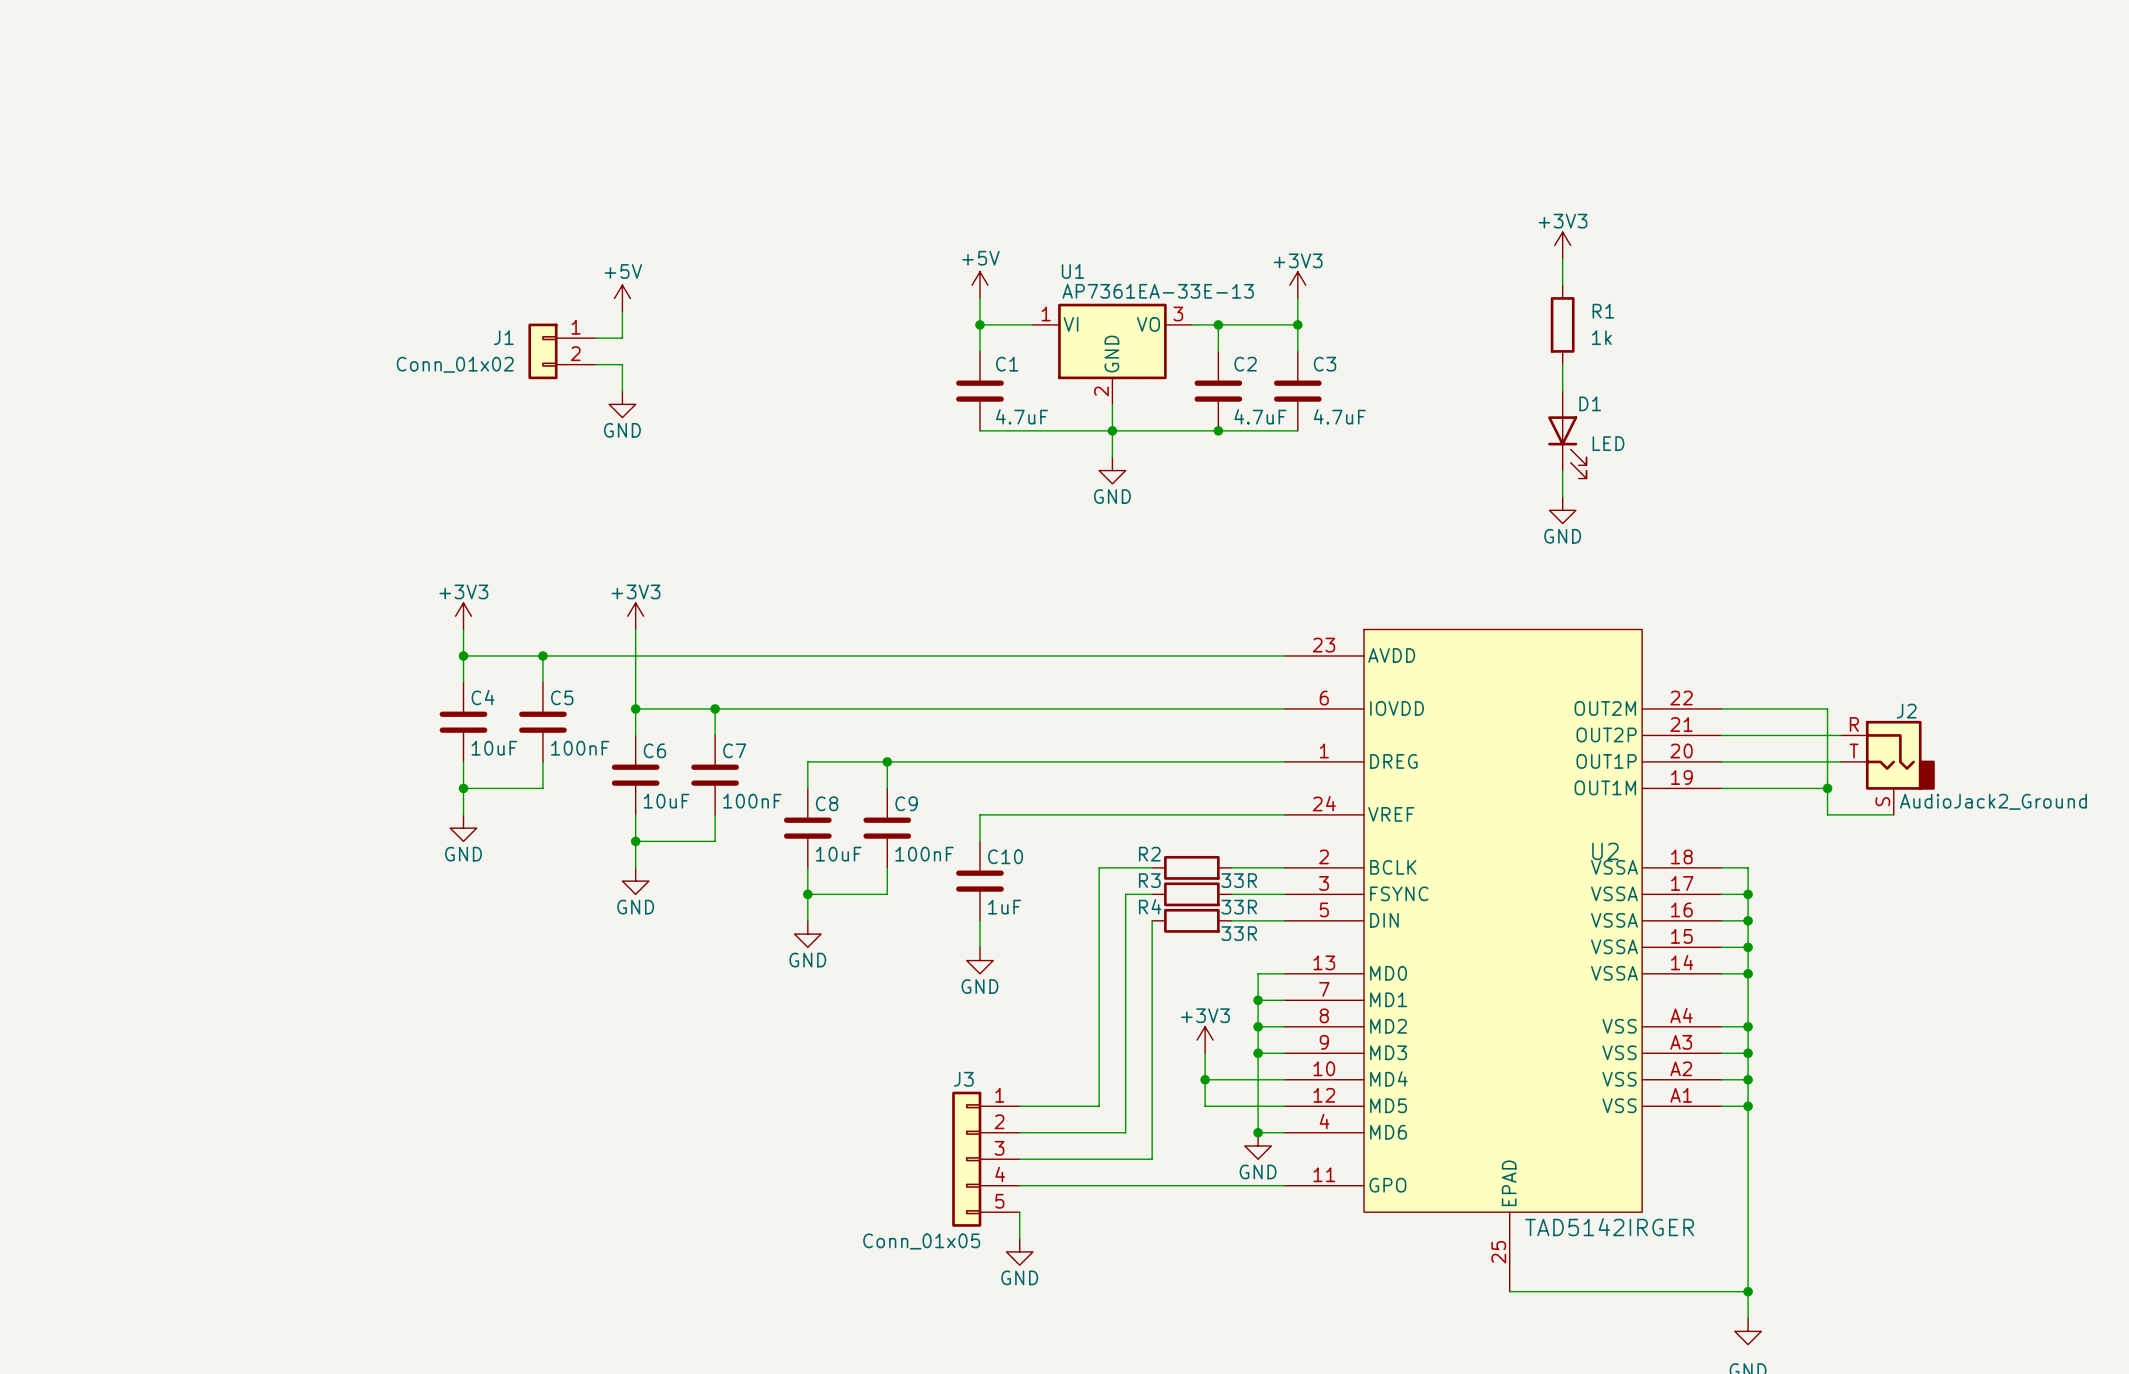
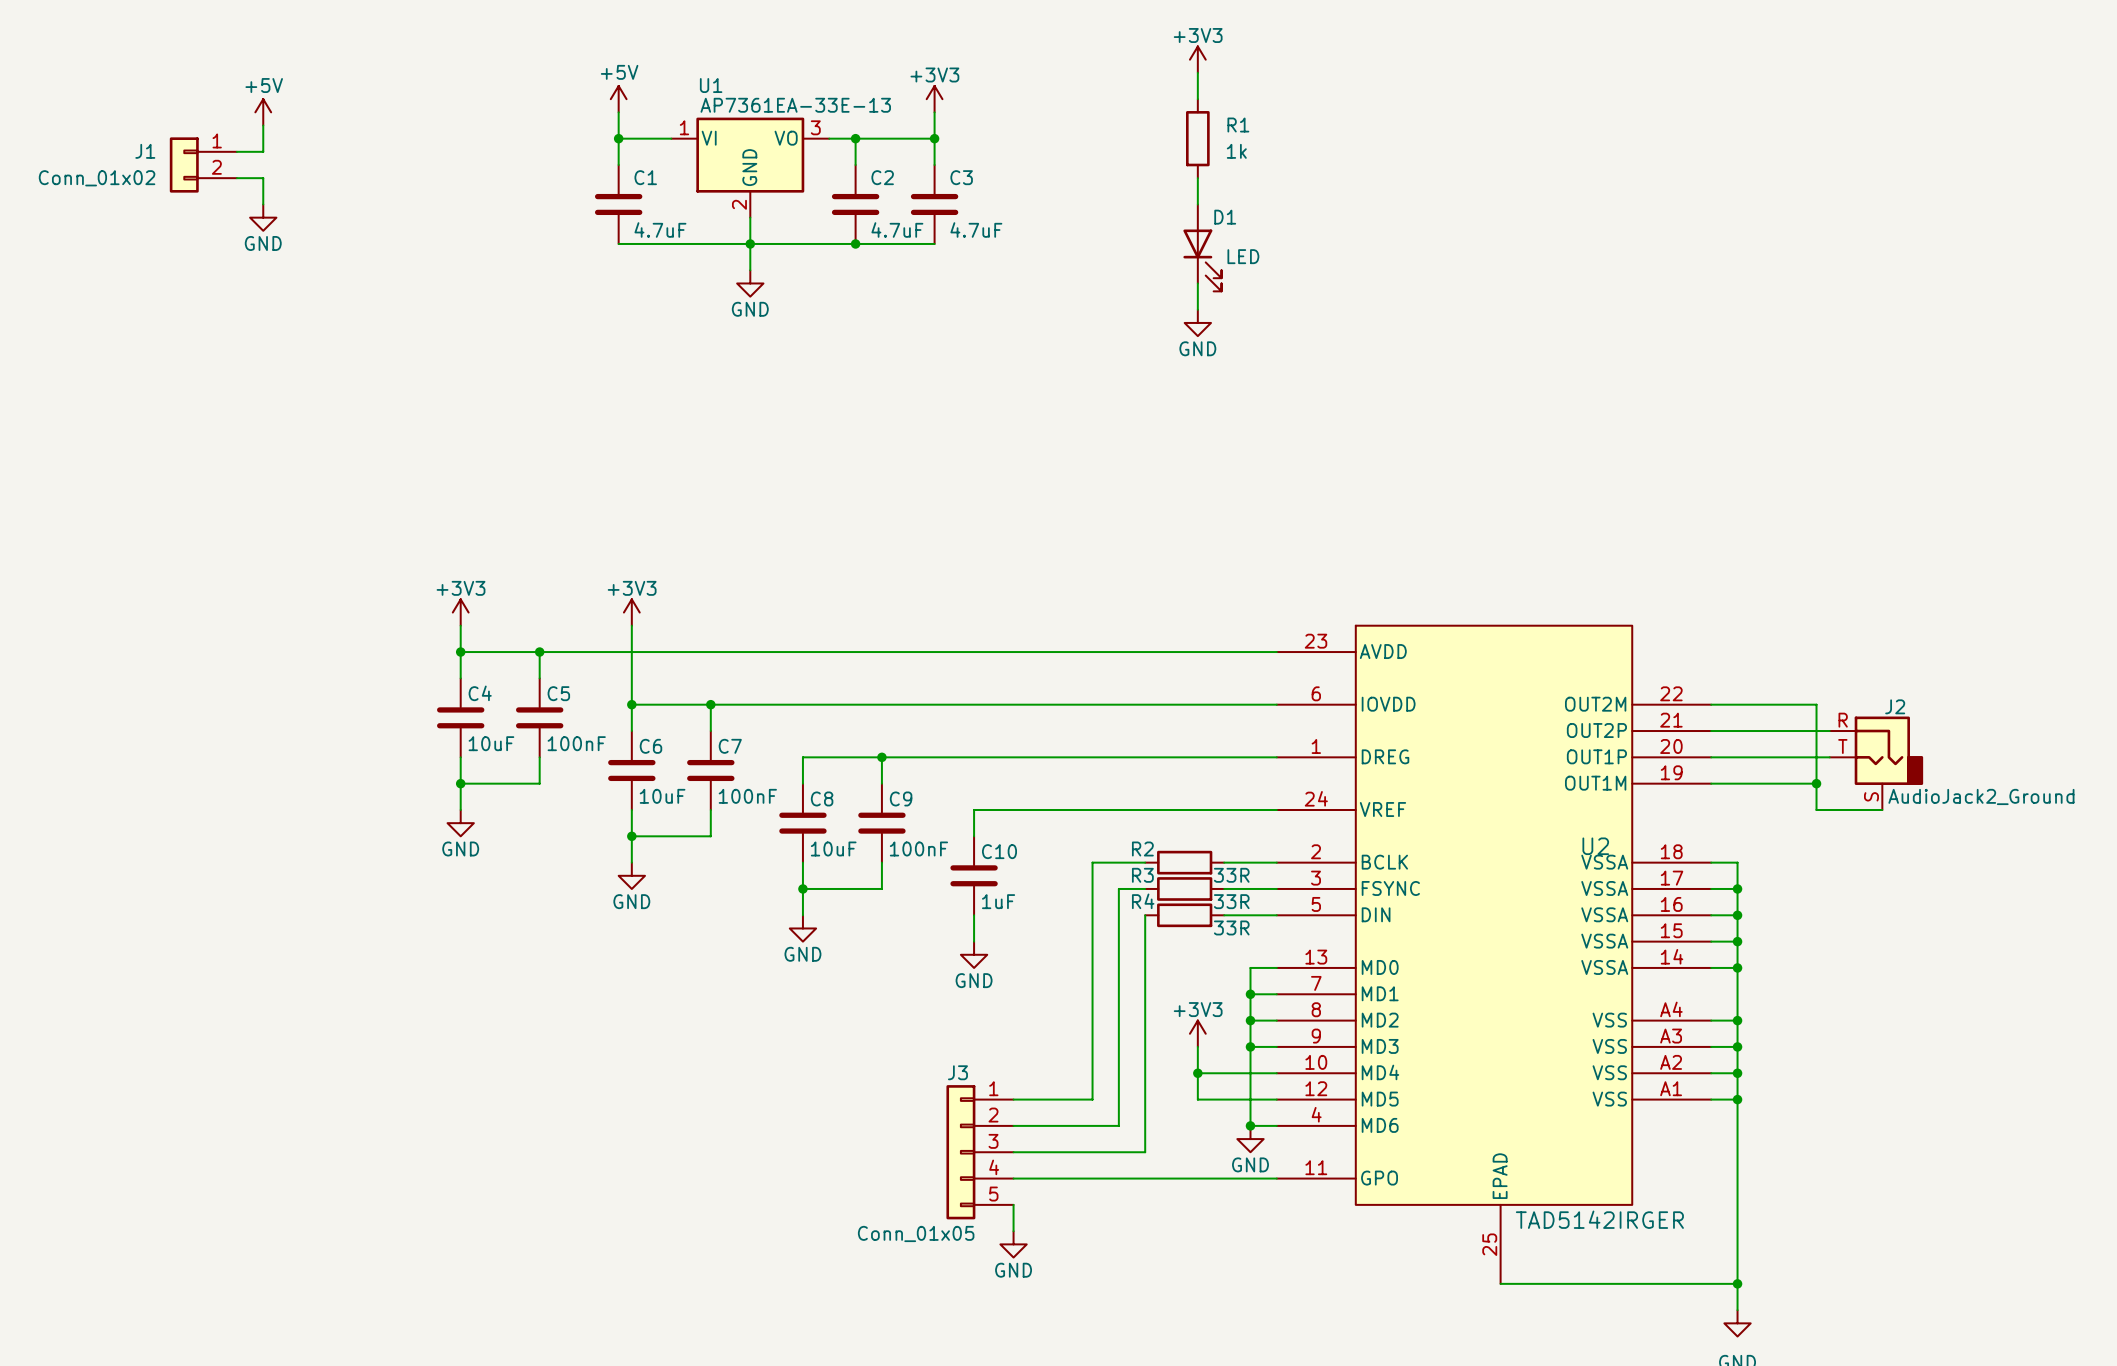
power symbol: none -> +3V3 (1197, 59)
wire: none -> (1197, 72) (1197, 99)
power symbol: none -> +3V3 (934, 99)
power symbol: none -> +5V (263, 112)
wire: none -> (618, 112) (618, 164)
wire: none -> (263, 125) (263, 151) (236, 151)
wire: none -> (618, 138) (671, 138)
junction: none -> (618, 138)
wire: none -> (829, 138) (934, 138)
wire: none -> (855, 138) (855, 164)
junction: none -> (855, 138)
junction: none -> (934, 138)
wire: none -> (236, 178) (263, 178) (263, 204)
wire: none -> (1197, 178) (1197, 204)
power symbol: none -> GND (263, 217)
wire: none -> (750, 217) (750, 270)
wire: none -> (618, 243) (934, 243)
junction: none -> (750, 243)
junction: none -> (855, 243)
power symbol: +3V3 (1562, 245) -> none
wire: (1562, 258) (1562, 285) -> none
power symbol: +5V (979, 285) -> none
power symbol: +3V3 (1297, 285) -> none
power symbol position: +5V (622, 298) -> +5V (618, 99)
wire: (979, 298) (979, 351) -> (934, 112) (934, 164)
wire: (1297, 298) (1297, 351) -> none
wire: (622, 311) (622, 338) (595, 338) -> none
wire: (979, 324) (1032, 324) -> none
junction: (979, 324) -> none
wire: (1191, 324) (1297, 324) -> none
wire: (1218, 324) (1218, 351) -> (1197, 283) (1197, 309)
junction: (1218, 324) -> none
junction: (1297, 324) -> none
R1 position: (1562, 324) -> (1197, 138)
J1 position: (562, 351) -> (203, 164)
U1 position: (1112, 354) -> (750, 167)
wire: (595, 364) (622, 364) (622, 391) -> none
wire: (1562, 364) (1562, 391) -> none
C1 position: (979, 391) -> (618, 204)
C2 position: (1218, 391) -> (855, 204)
C3 position: (1297, 391) -> (934, 204)
power symbol position: GND (622, 404) -> GND (750, 283)
wire: (1112, 404) (1112, 457) -> none
wire: (979, 430) (1297, 430) -> none
junction: (1112, 430) -> none
junction: (1218, 430) -> none
D1 position: (1567, 434) -> (1202, 247)
power symbol position: GND (1112, 470) -> GND (1197, 322)
wire: (1562, 470) (1562, 497) -> none
power symbol: GND (1562, 510) -> none

